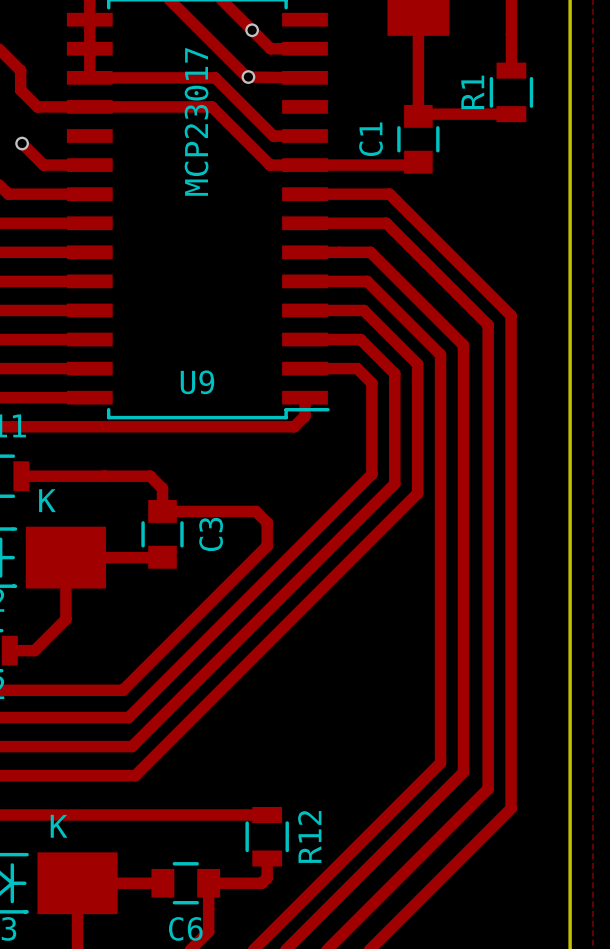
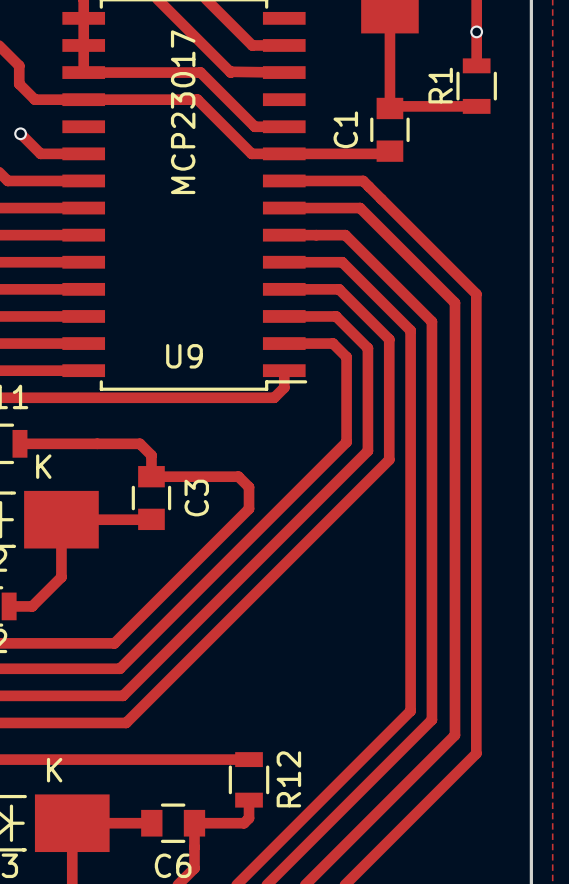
via: (252, 30) -> none
via: none -> (476, 31)
via: (248, 77) -> none

